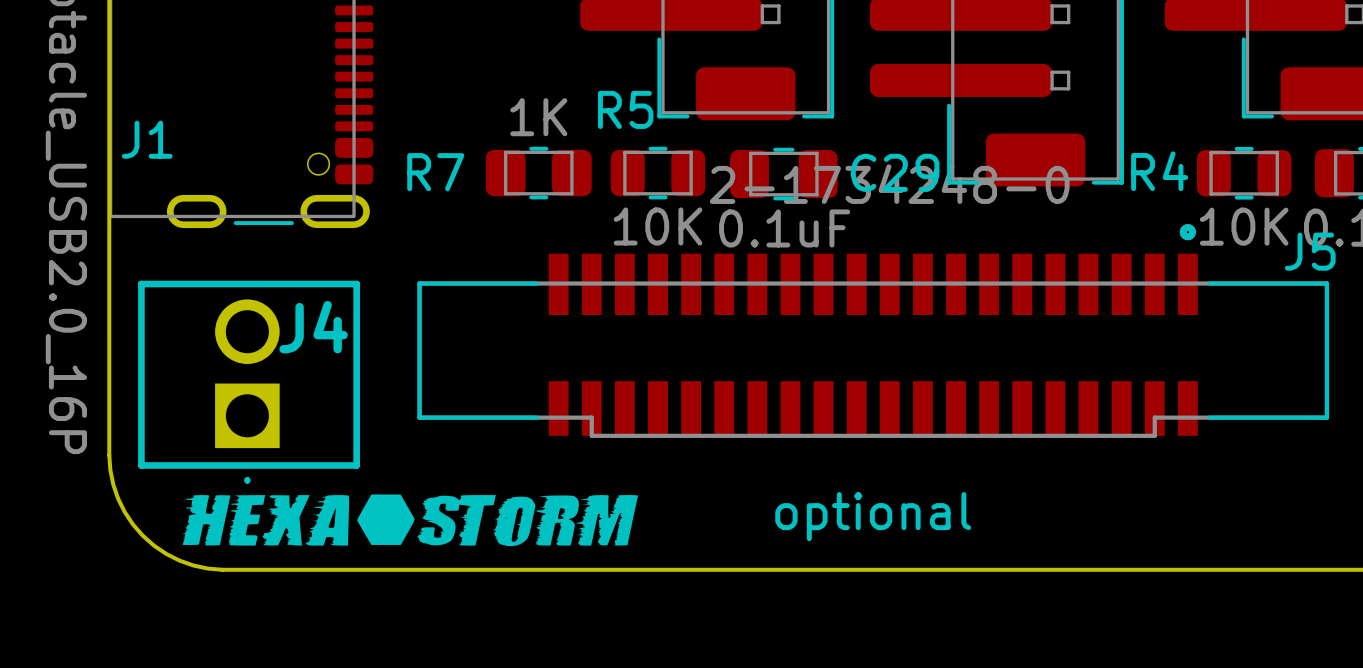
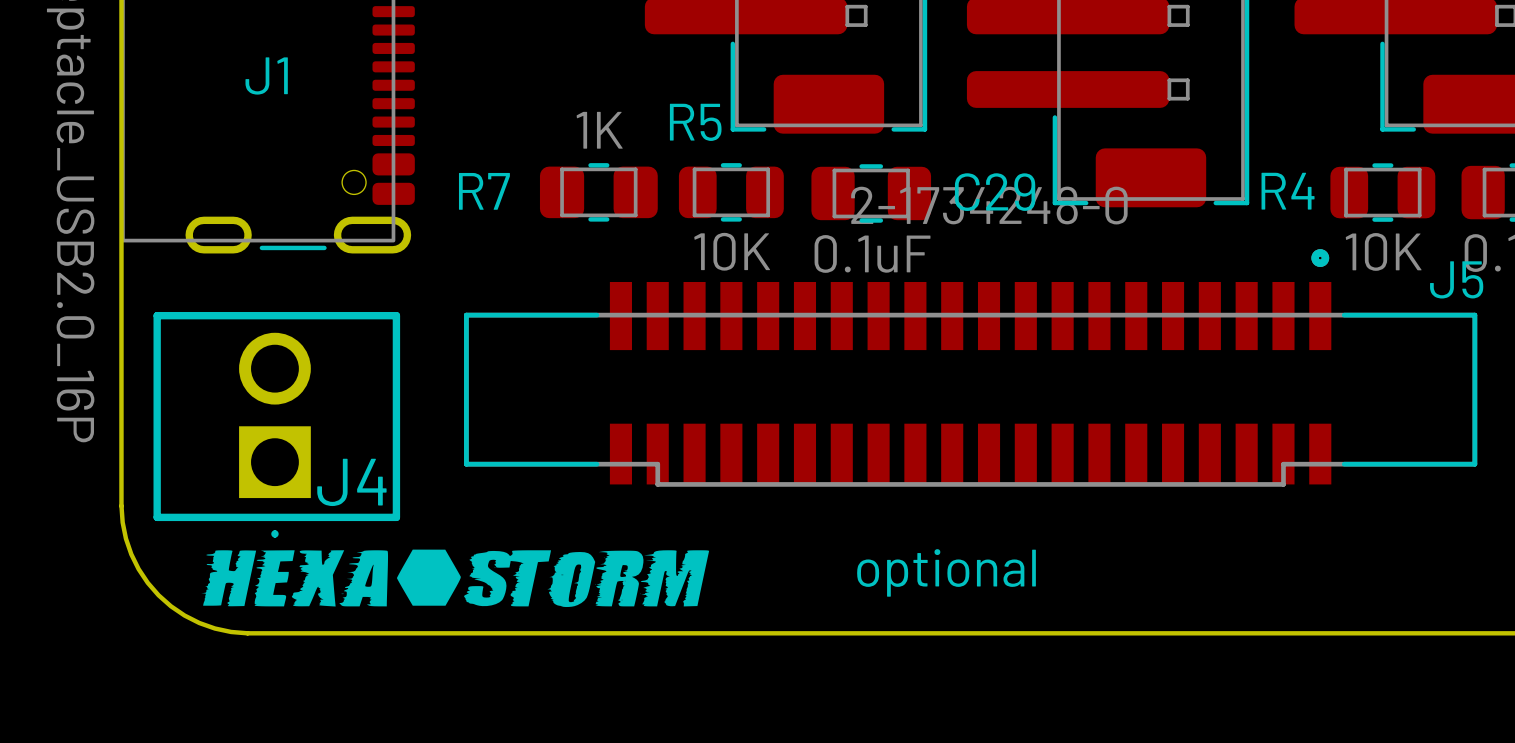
J1 name position: J1 (147, 139) -> J1 (266, 75)
J4 name position: J4 (313, 327) -> J4 (351, 482)

